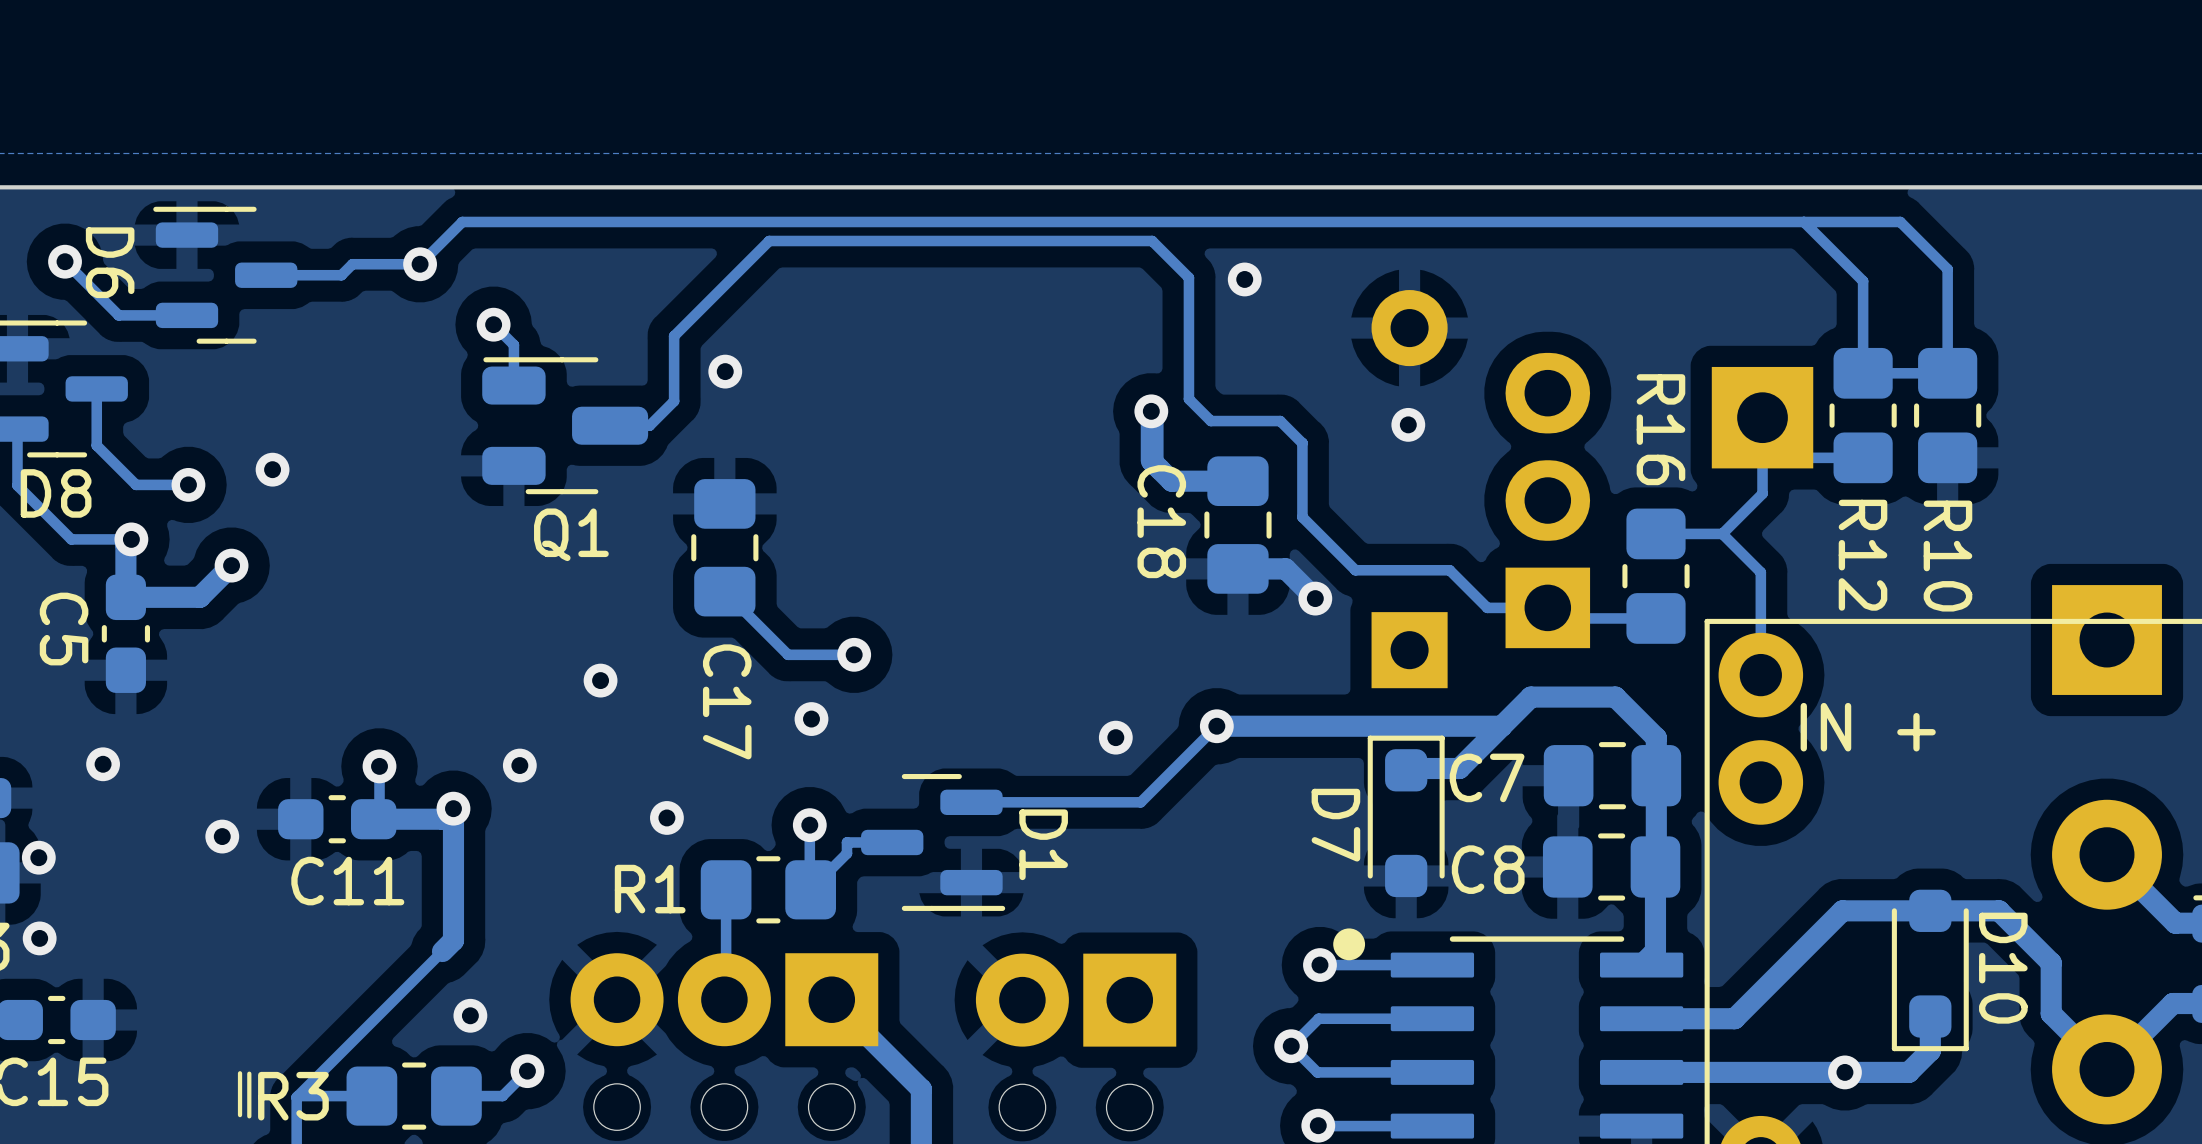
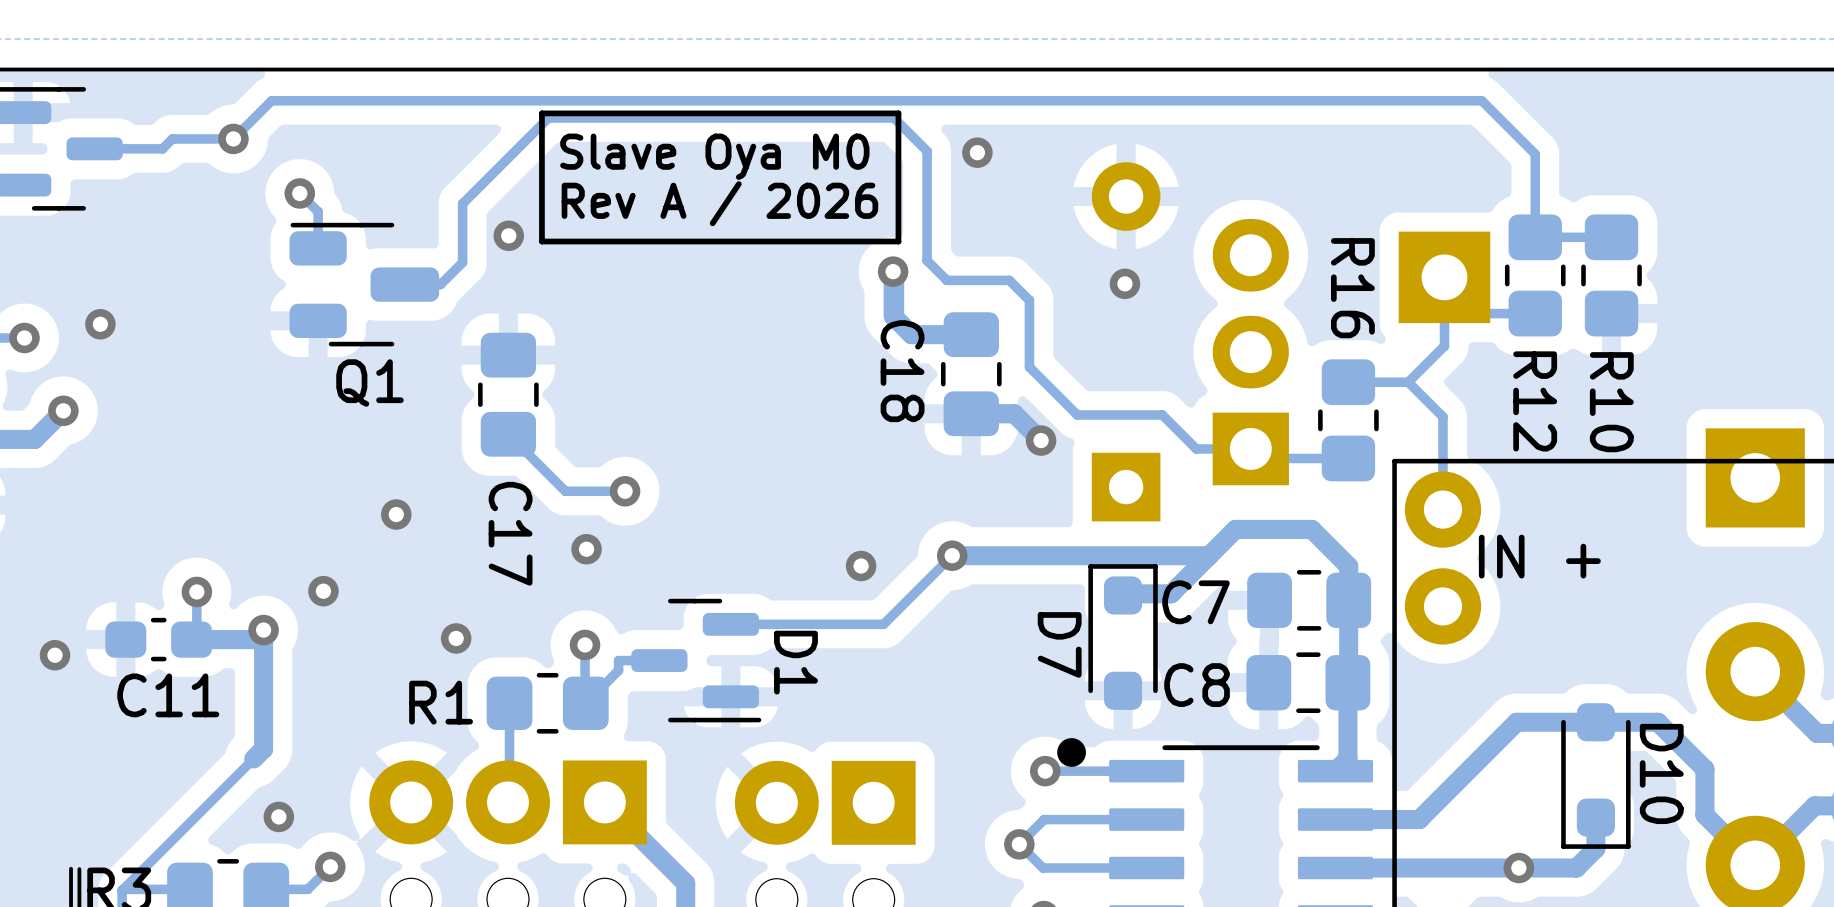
track: (1803, 221) (1900, 221) (1947, 269) (1947, 373) -> none
line: none -> (898, 113) (541, 113) (541, 241) (898, 241) (898, 113)
text: none -> Slave Oya M0 (714, 156)
text: none -> Rev A / 2026 (719, 203)

